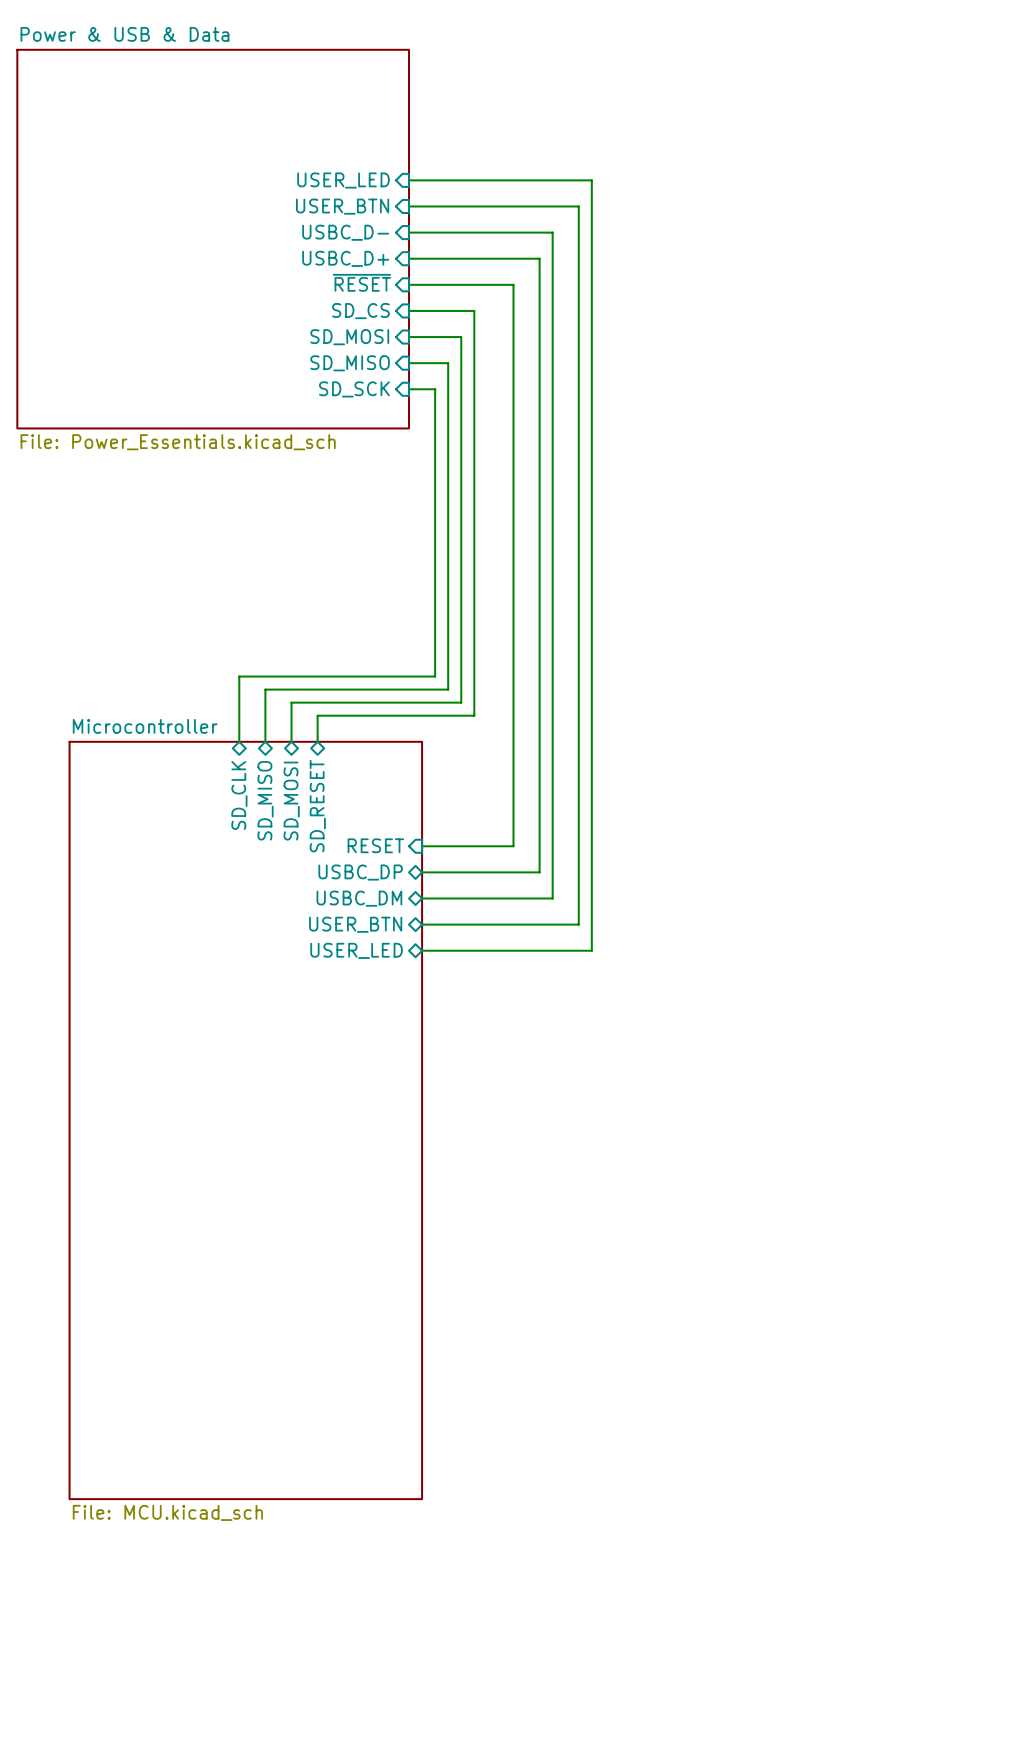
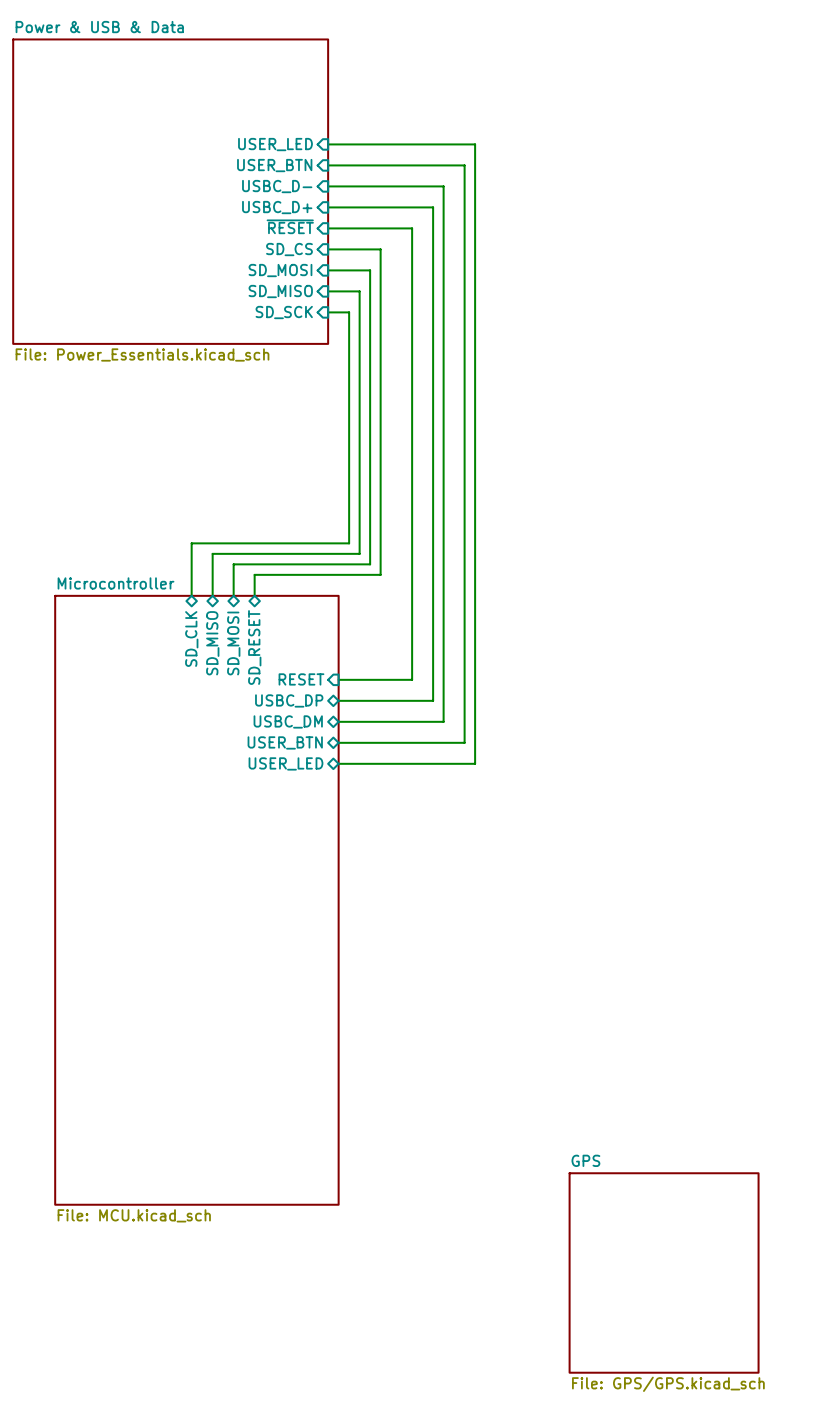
sheet GPS: none -> File: GPS/GPS.kicad_sch (664, 1272)

